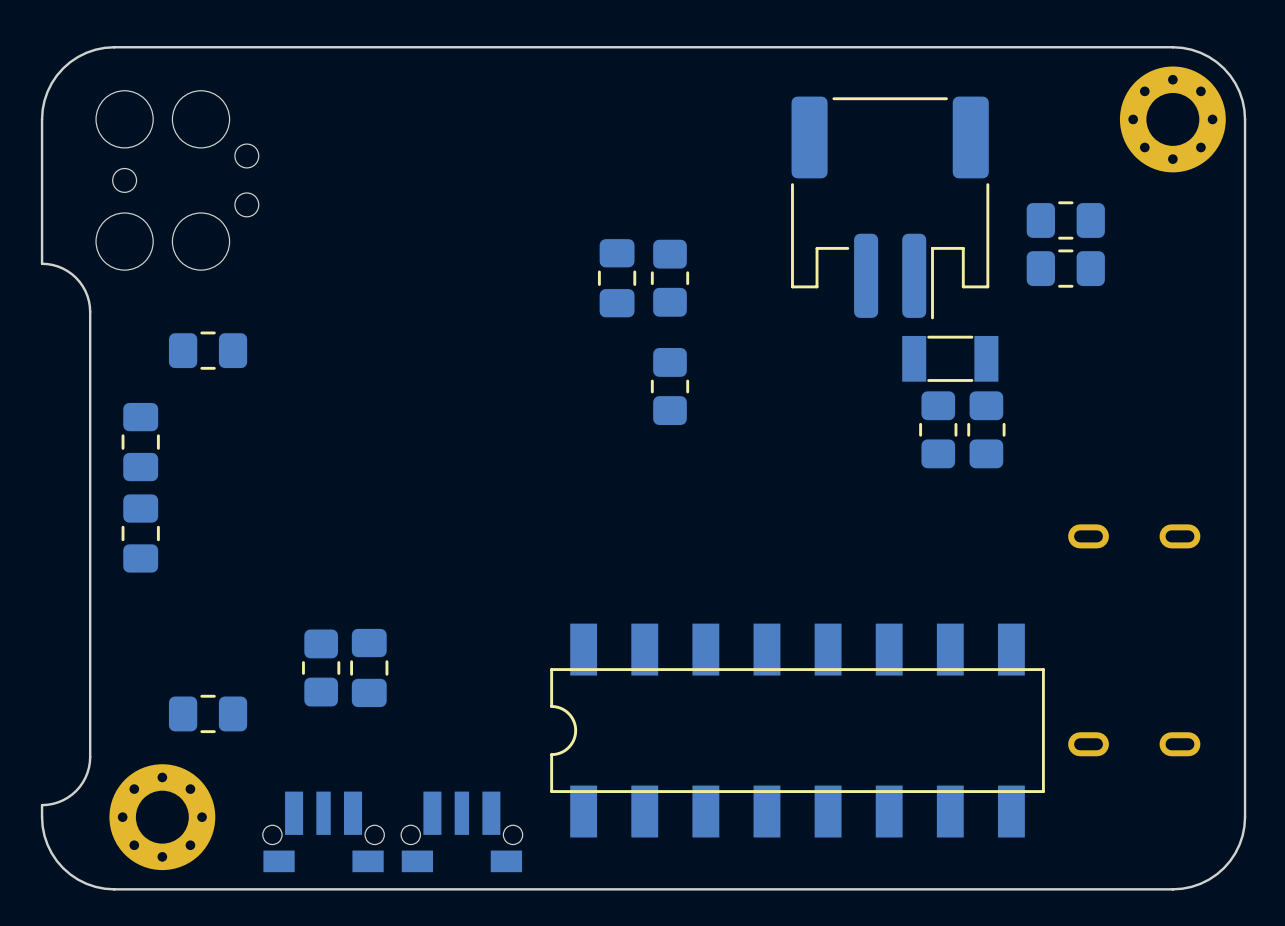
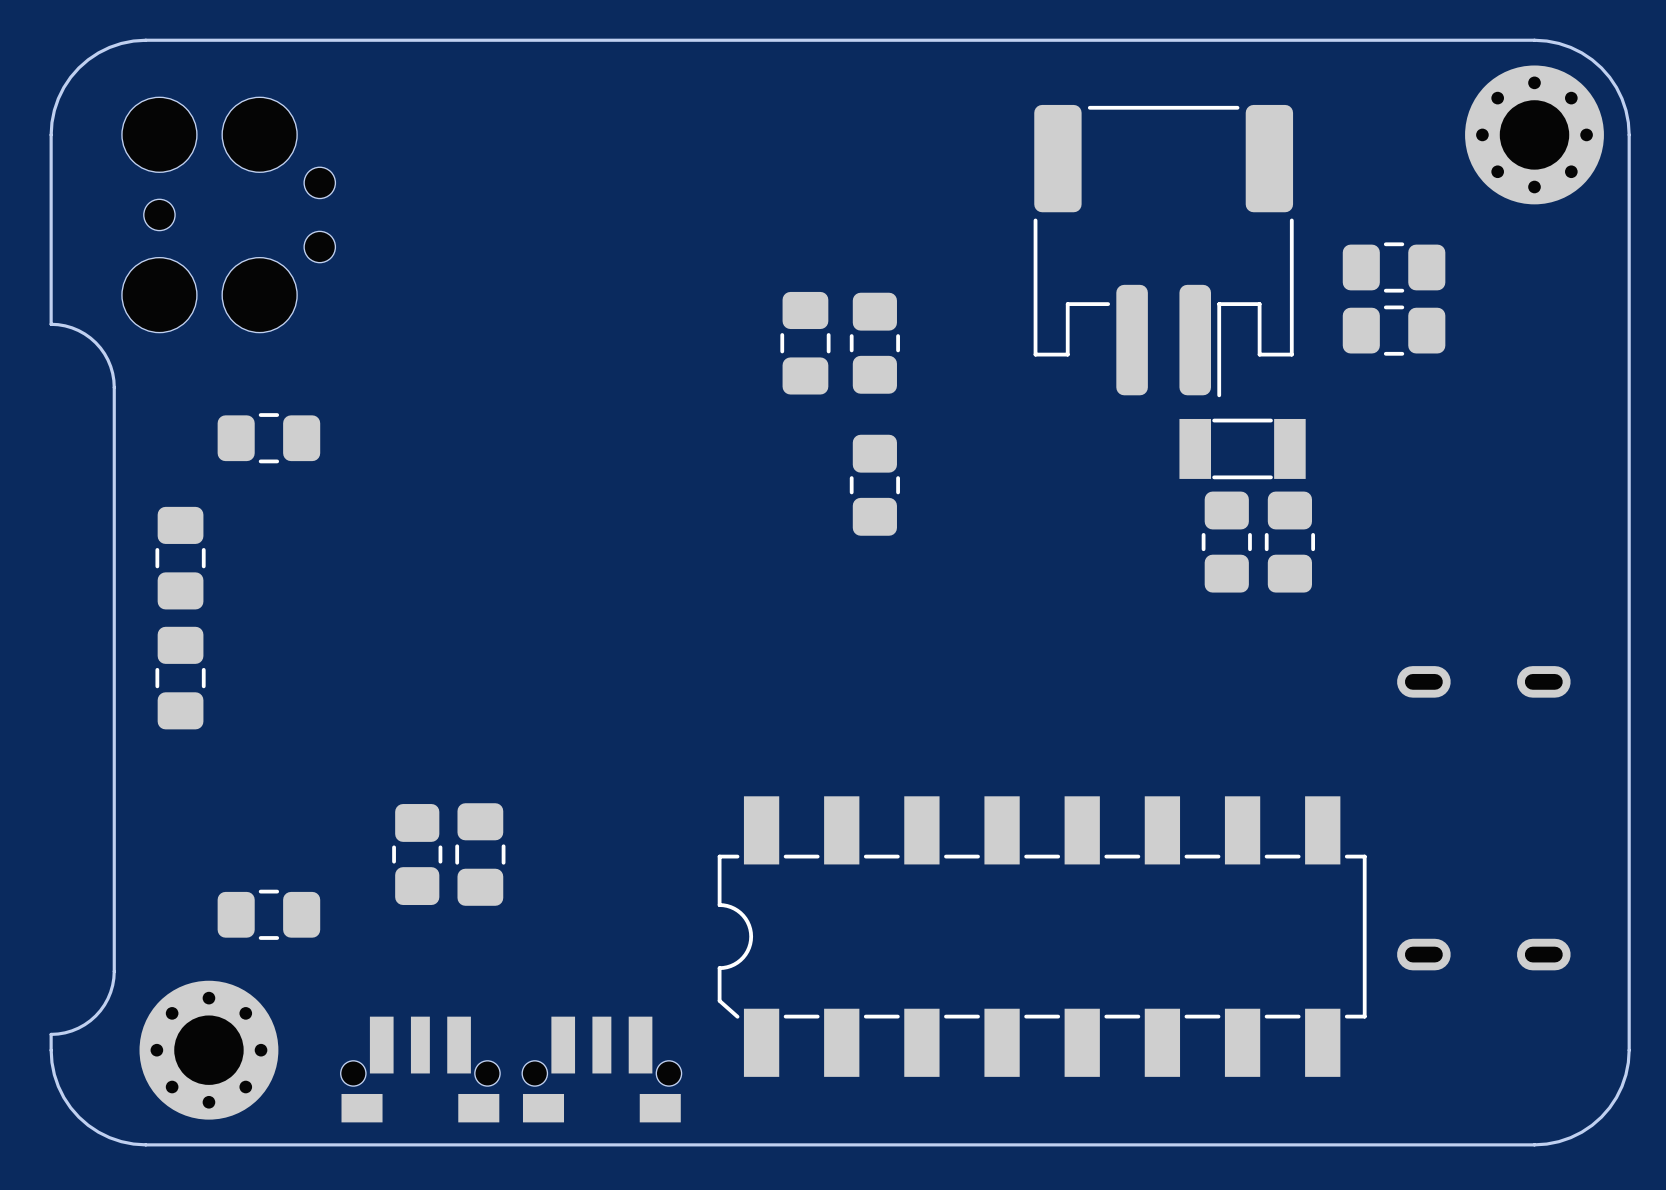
part footprint: [550, 623, 1045, 838] -> [717, 796, 1367, 1077]

